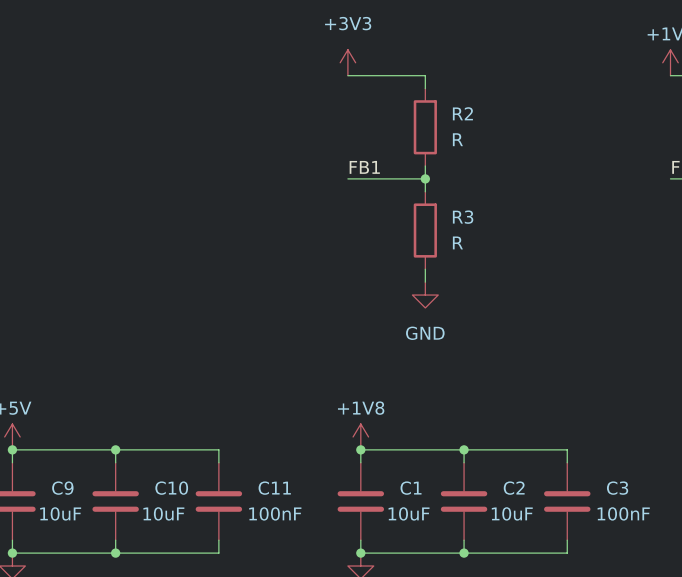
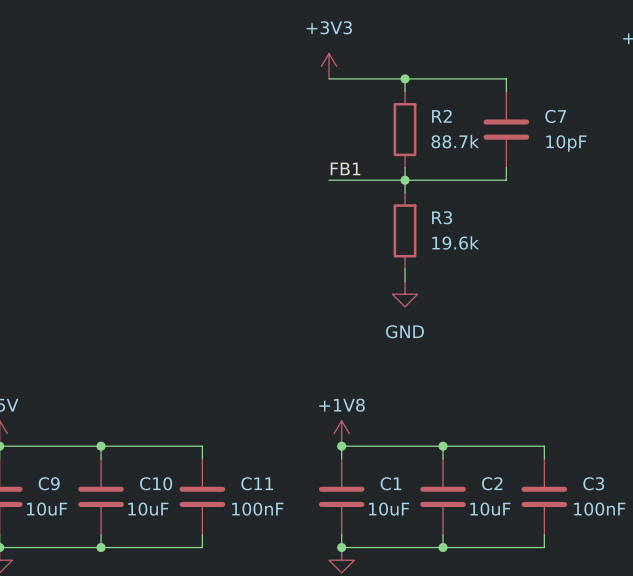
wire: none -> (405, 78) (506, 78) (506, 91)
junction: none -> (405, 78)
C7: none -> 10pF (506, 129)
R2 value: R (457, 139) -> 88.7k (455, 141)
wire: none -> (506, 167) (506, 180) (405, 180)
R3 value: R (457, 242) -> 19.6k (455, 242)

